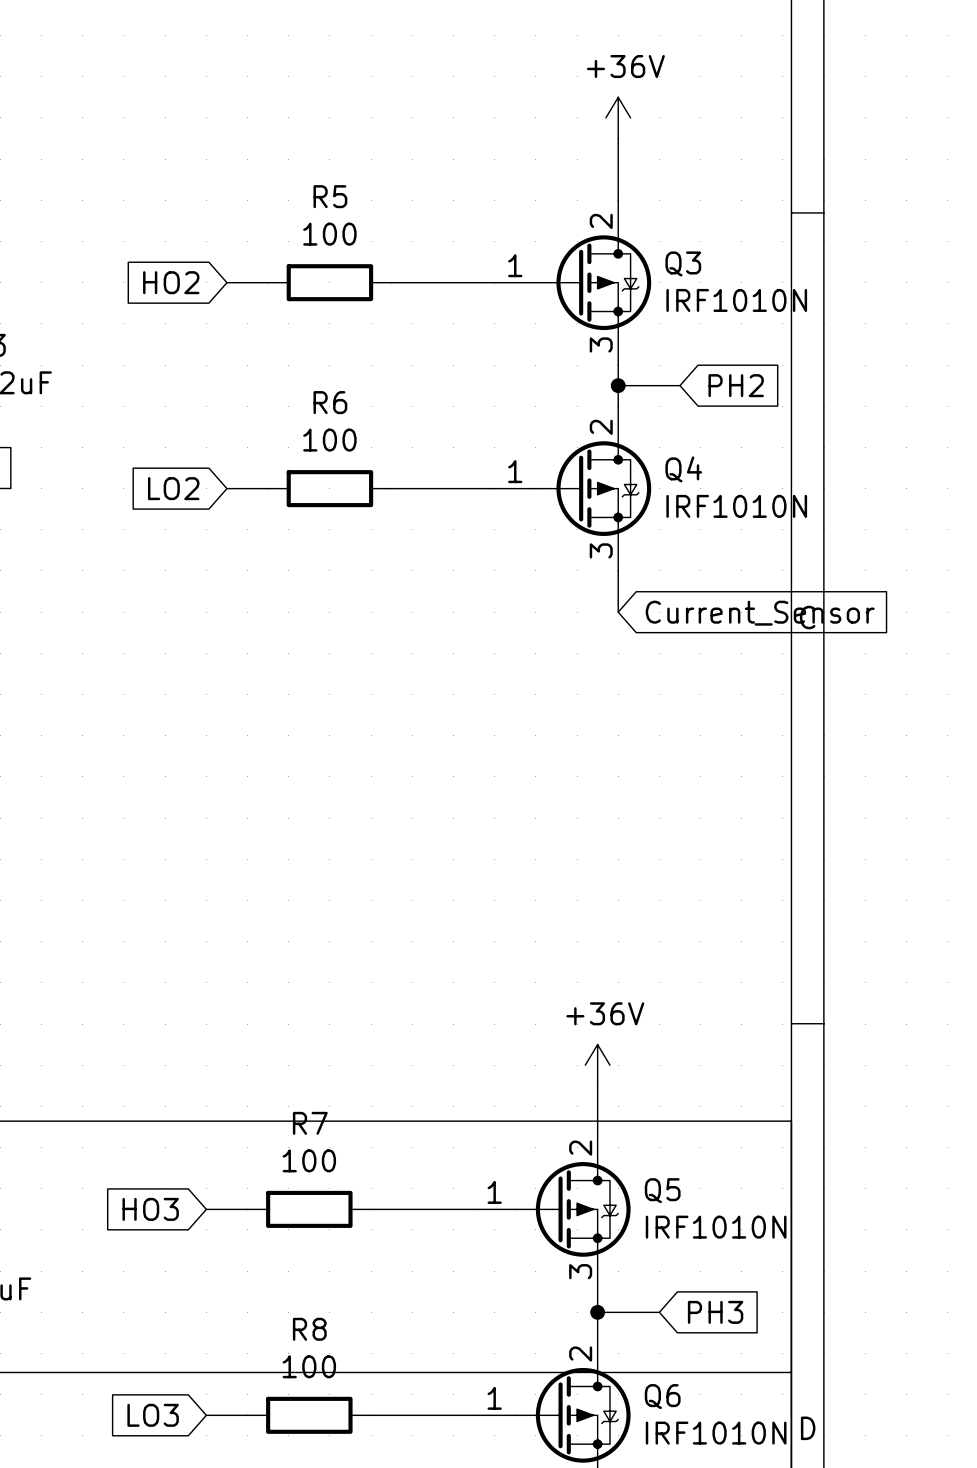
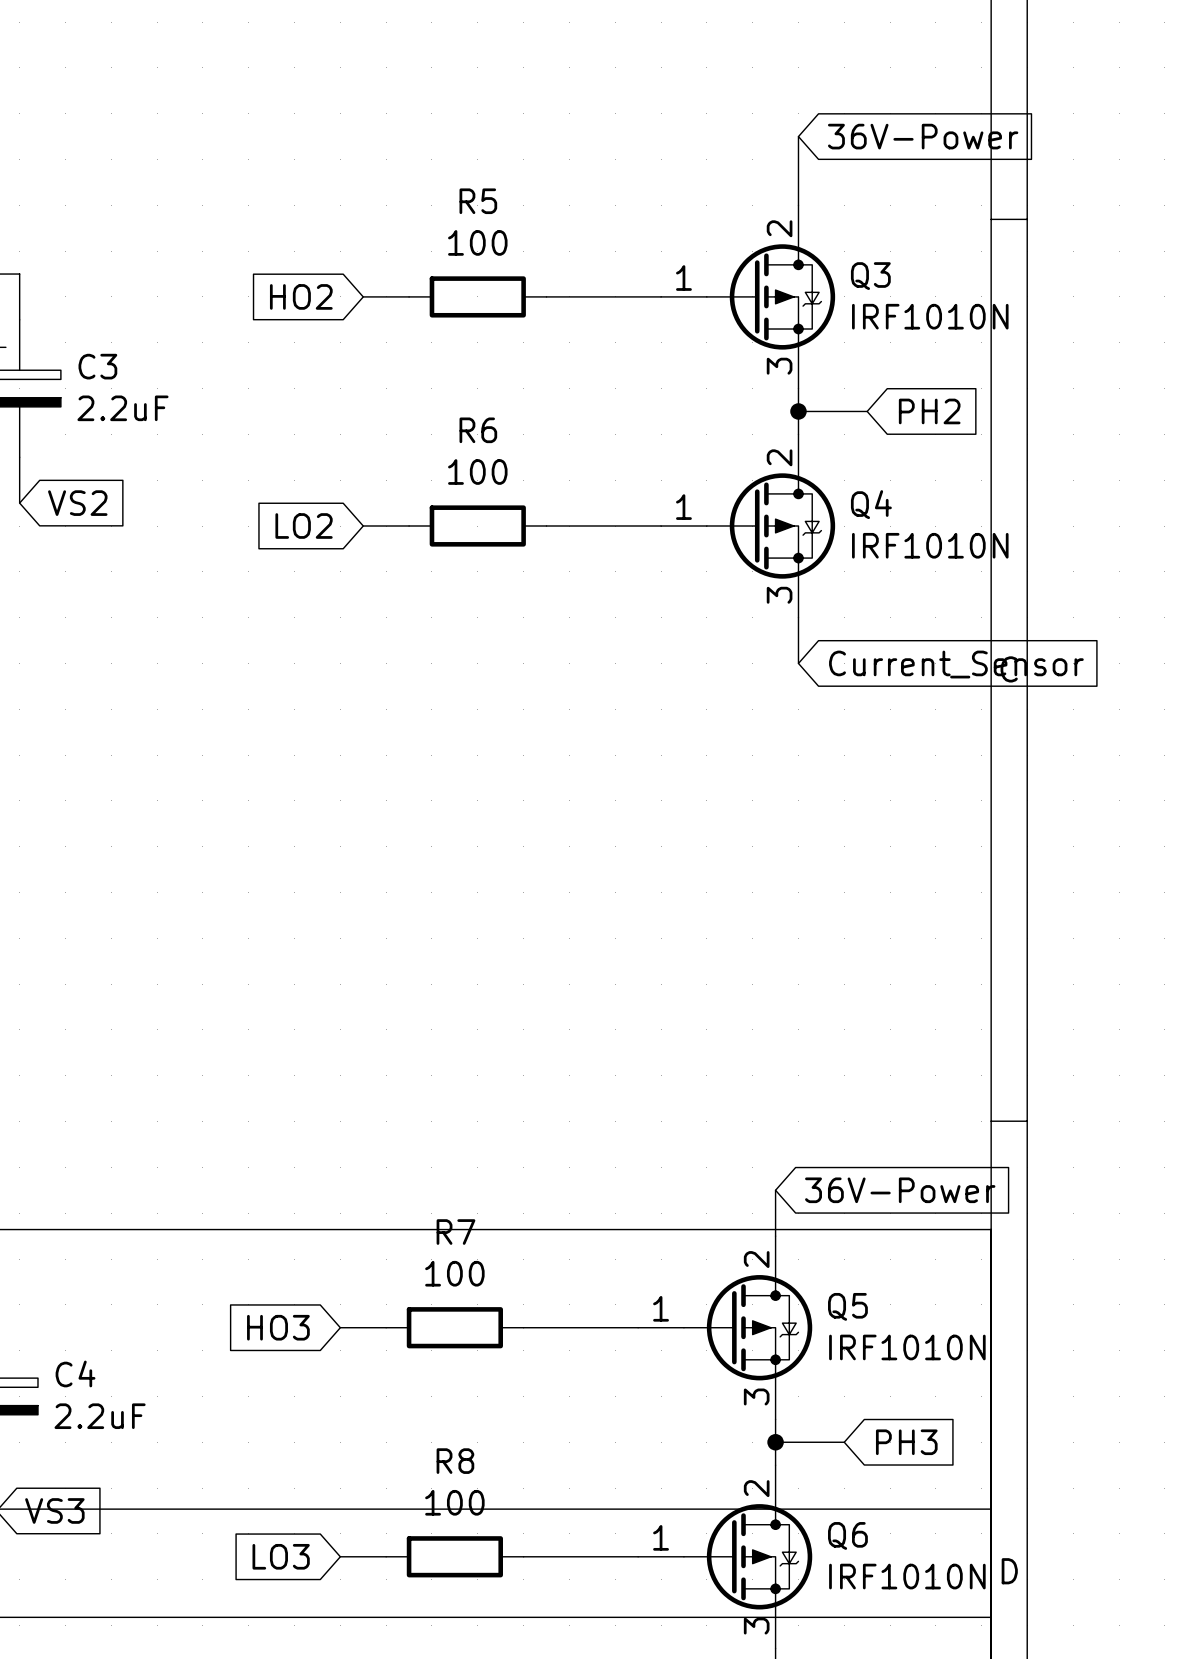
power symbol: +36V (618, 117) -> none
global label: none -> 36V-Power (923, 136)
power symbol: +36V (597, 1065) -> none
global label: none -> 36V-Power (900, 1190)

